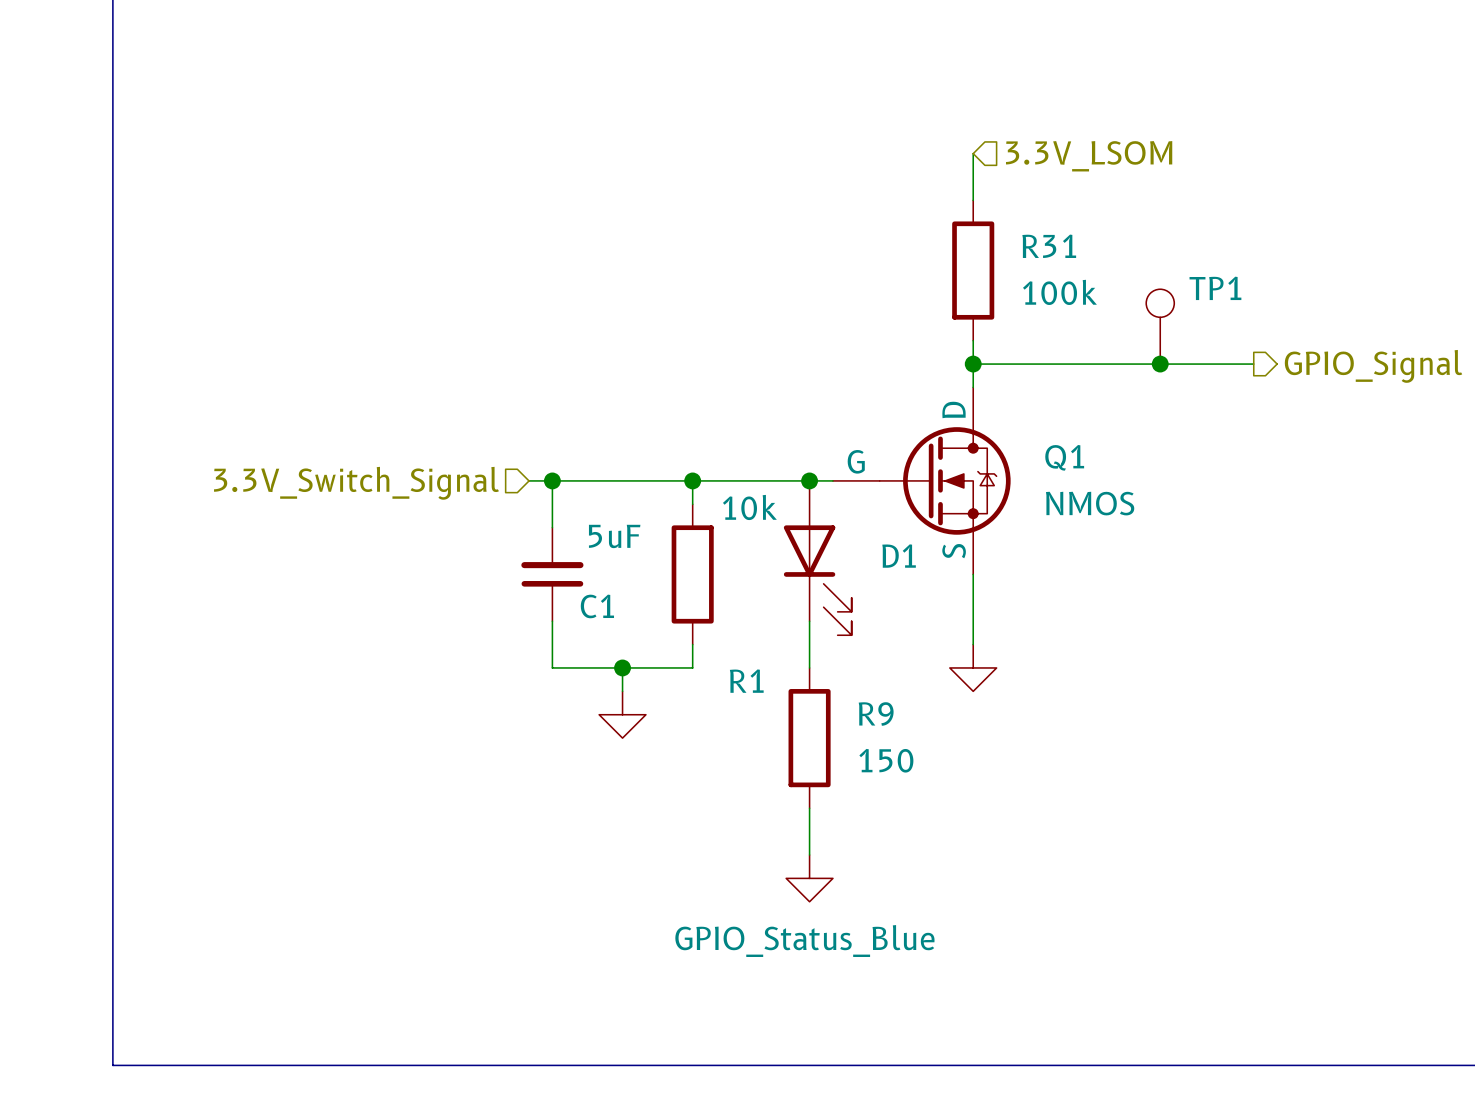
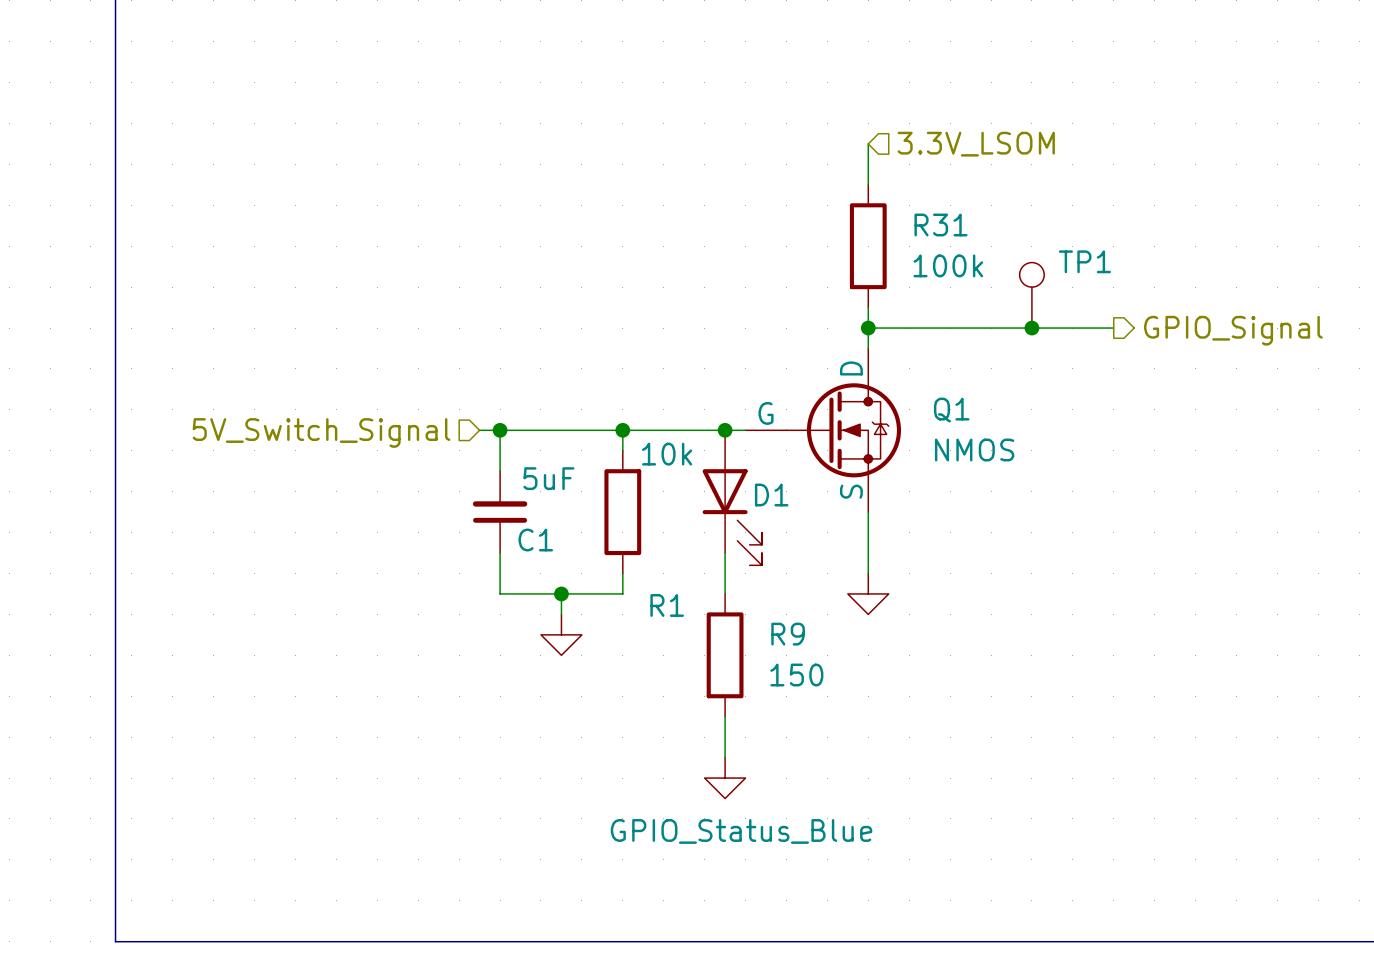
hierarchical label: 3.3V_Switch_Signal (356, 483) -> 5V_Switch_Signal (321, 432)
D1 name position: D1 (899, 556) -> D1 (771, 495)

